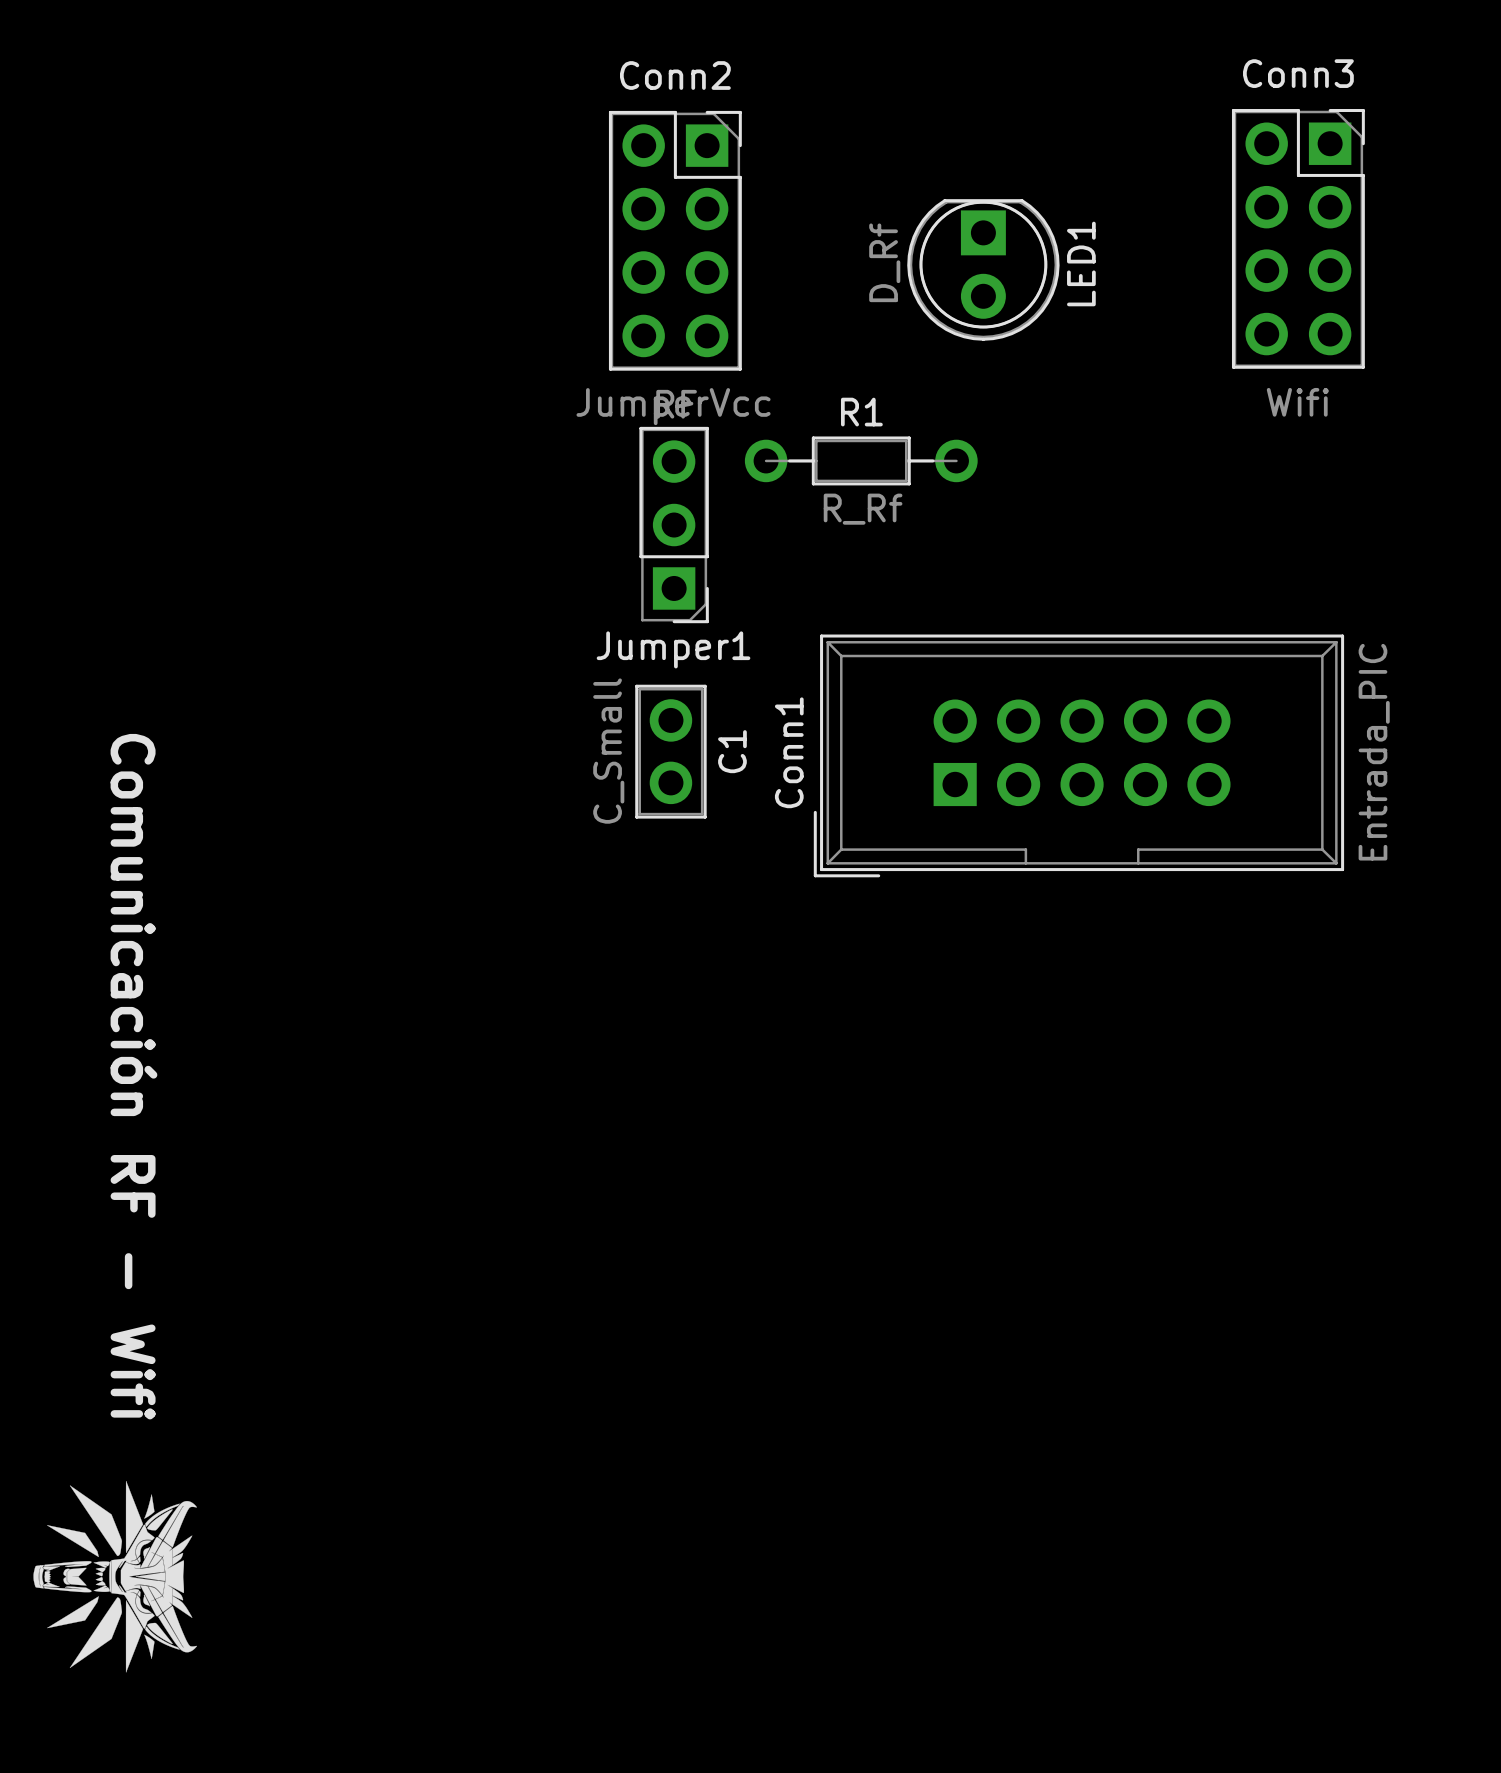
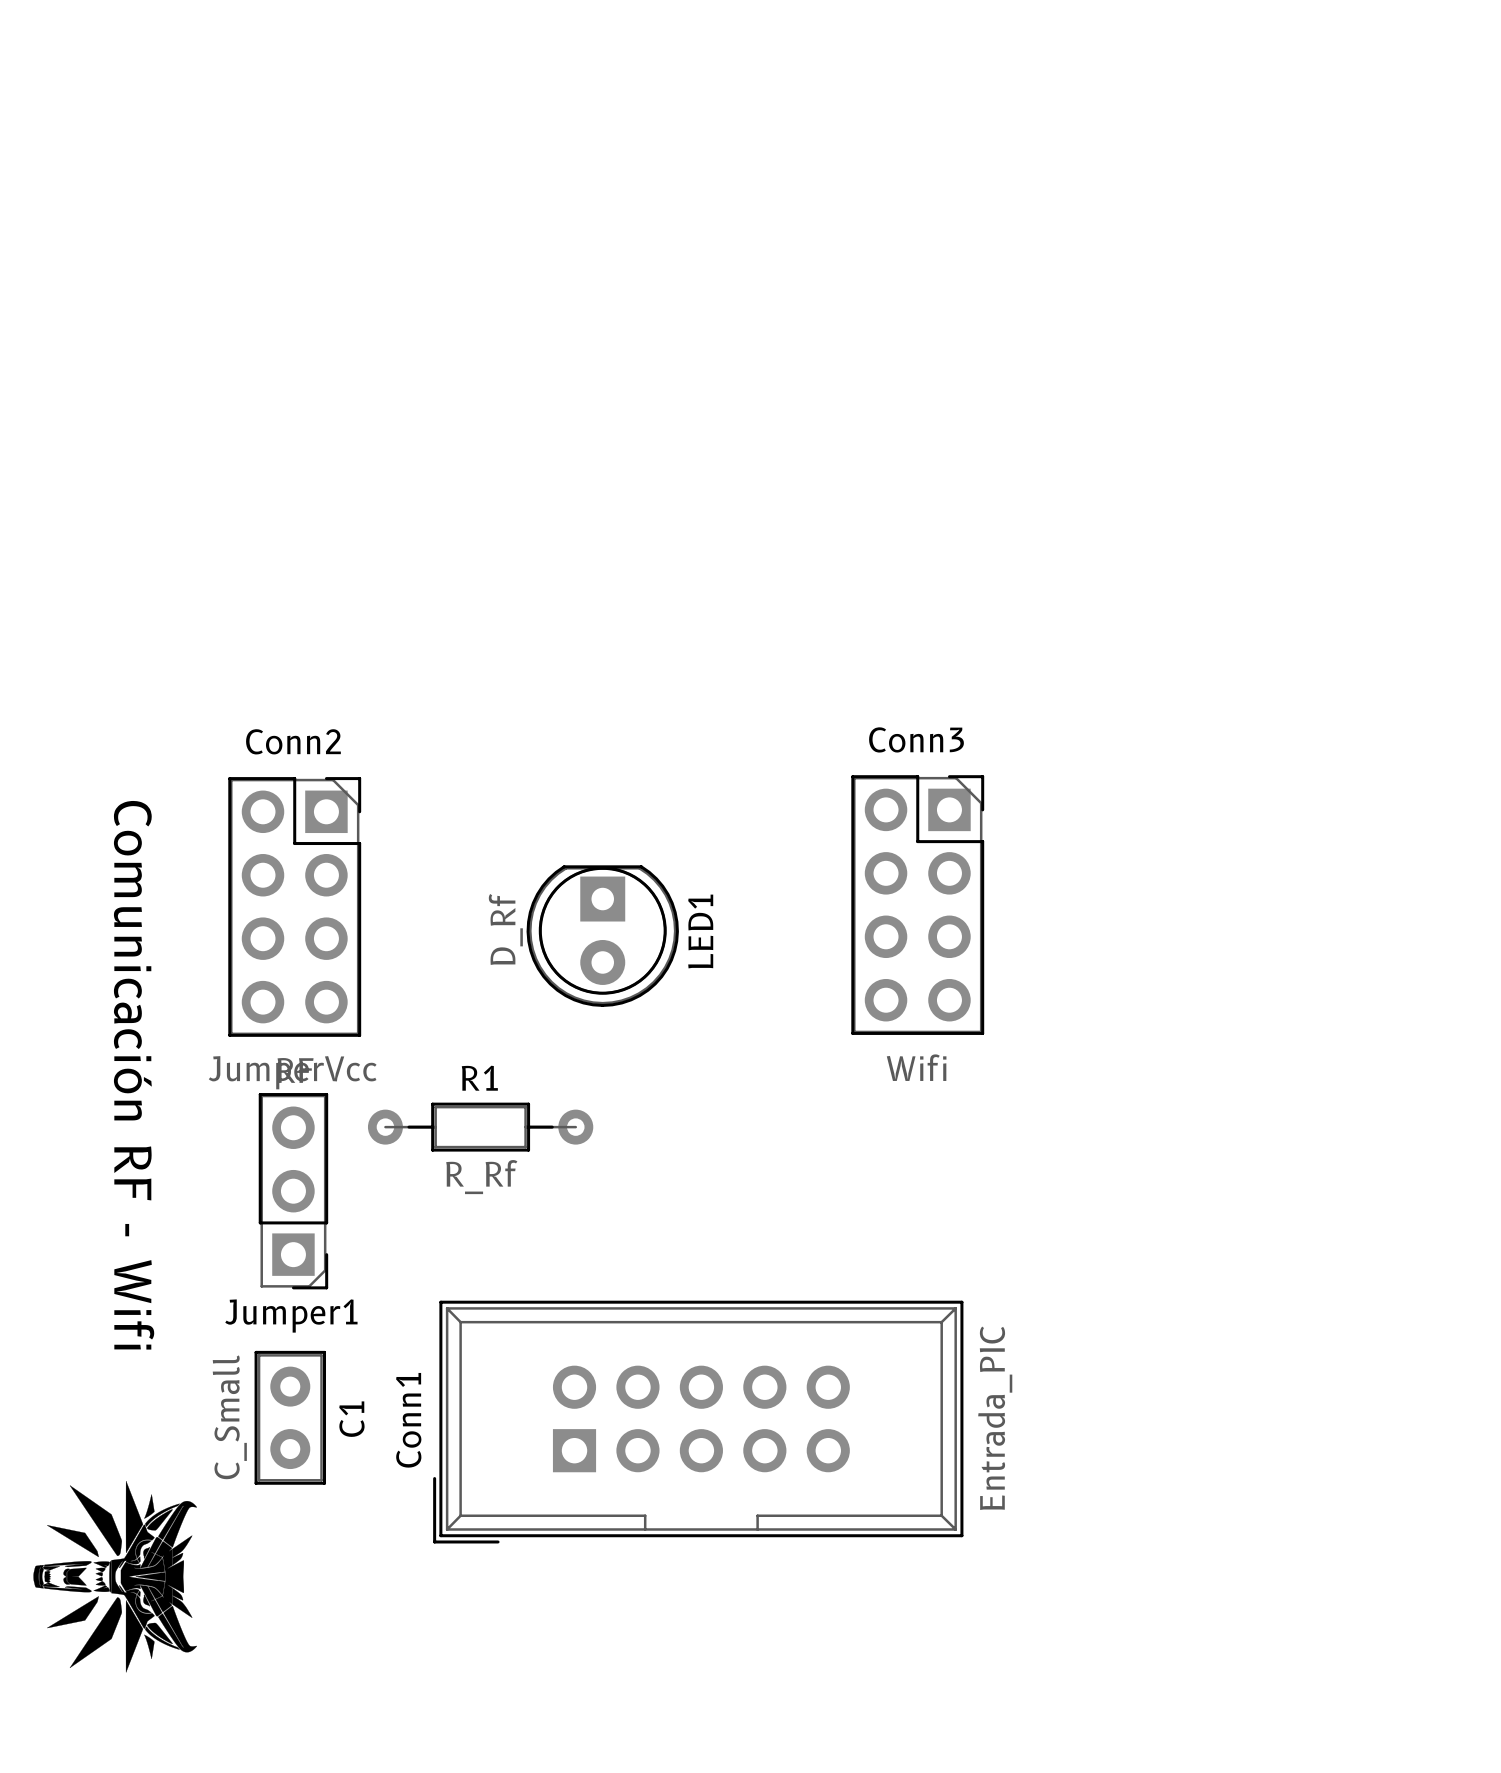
LED1 footprint: [907, 199, 1060, 341] -> [526, 865, 679, 1007]
Conn3 position: (1298, 238) -> (917, 905)
Conn2 position: (675, 240) -> (294, 906)
R1 footprint: [744, 436, 978, 486] -> [367, 1102, 594, 1152]
Jumper1 position: (674, 525) -> (293, 1191)
C1 footprint: [635, 684, 707, 819] -> [254, 1350, 327, 1485]
Conn1 position: (1078, 755) -> (698, 1422)

